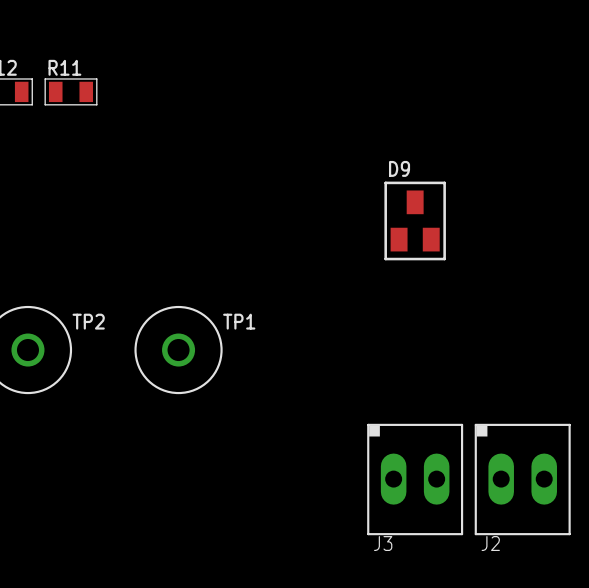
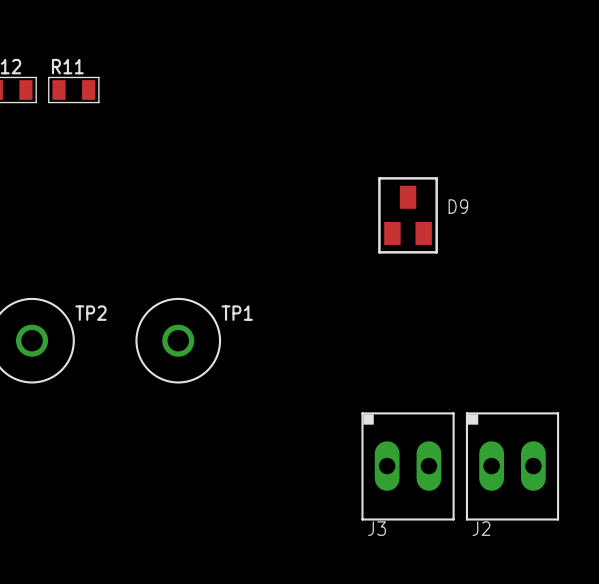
D9 name position: D9 (399, 168) -> D9 (458, 206)

